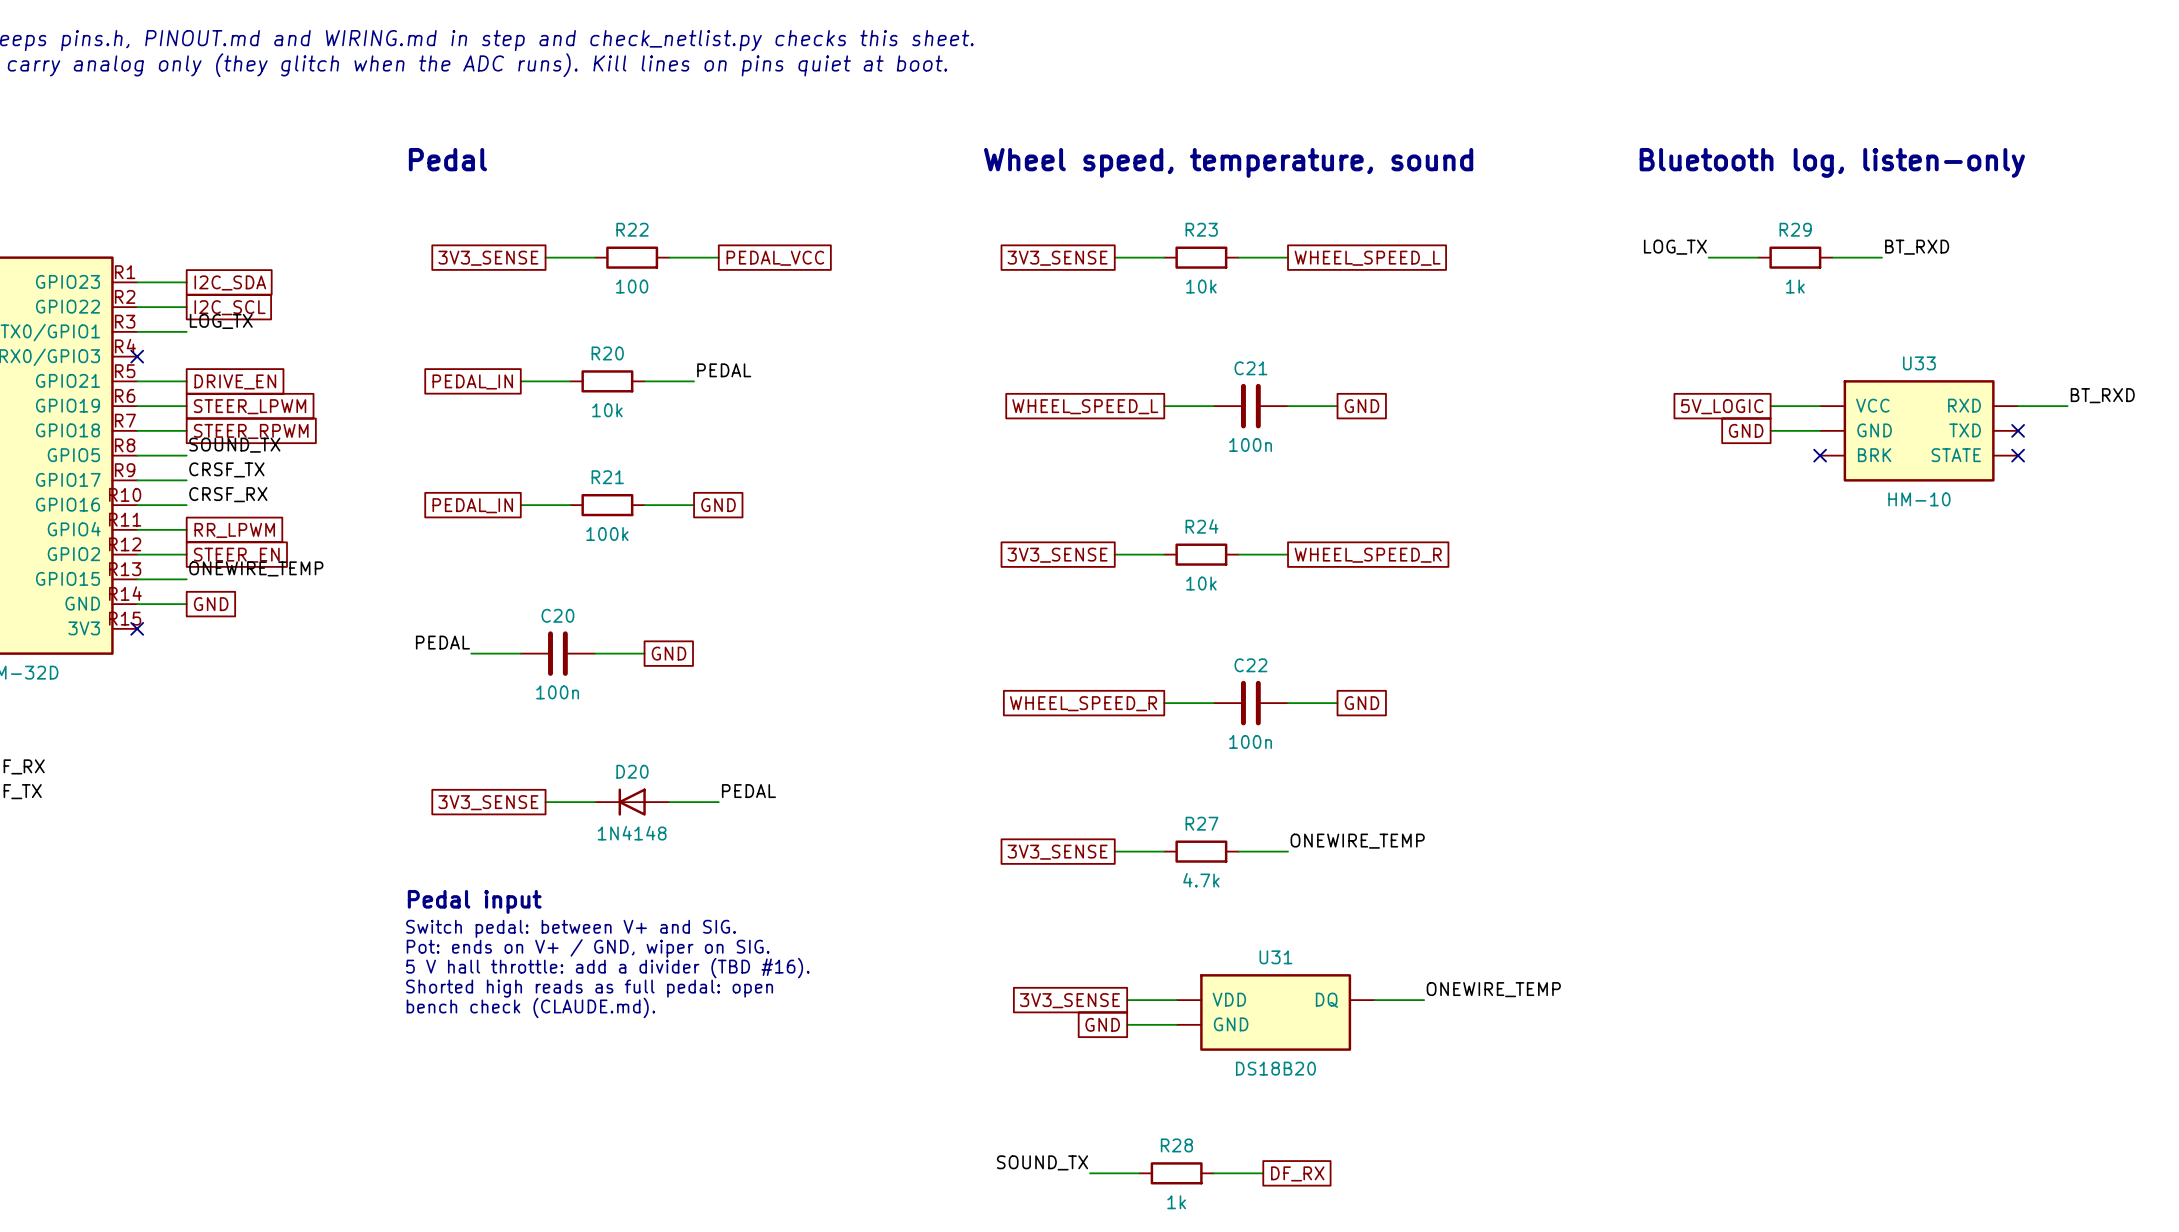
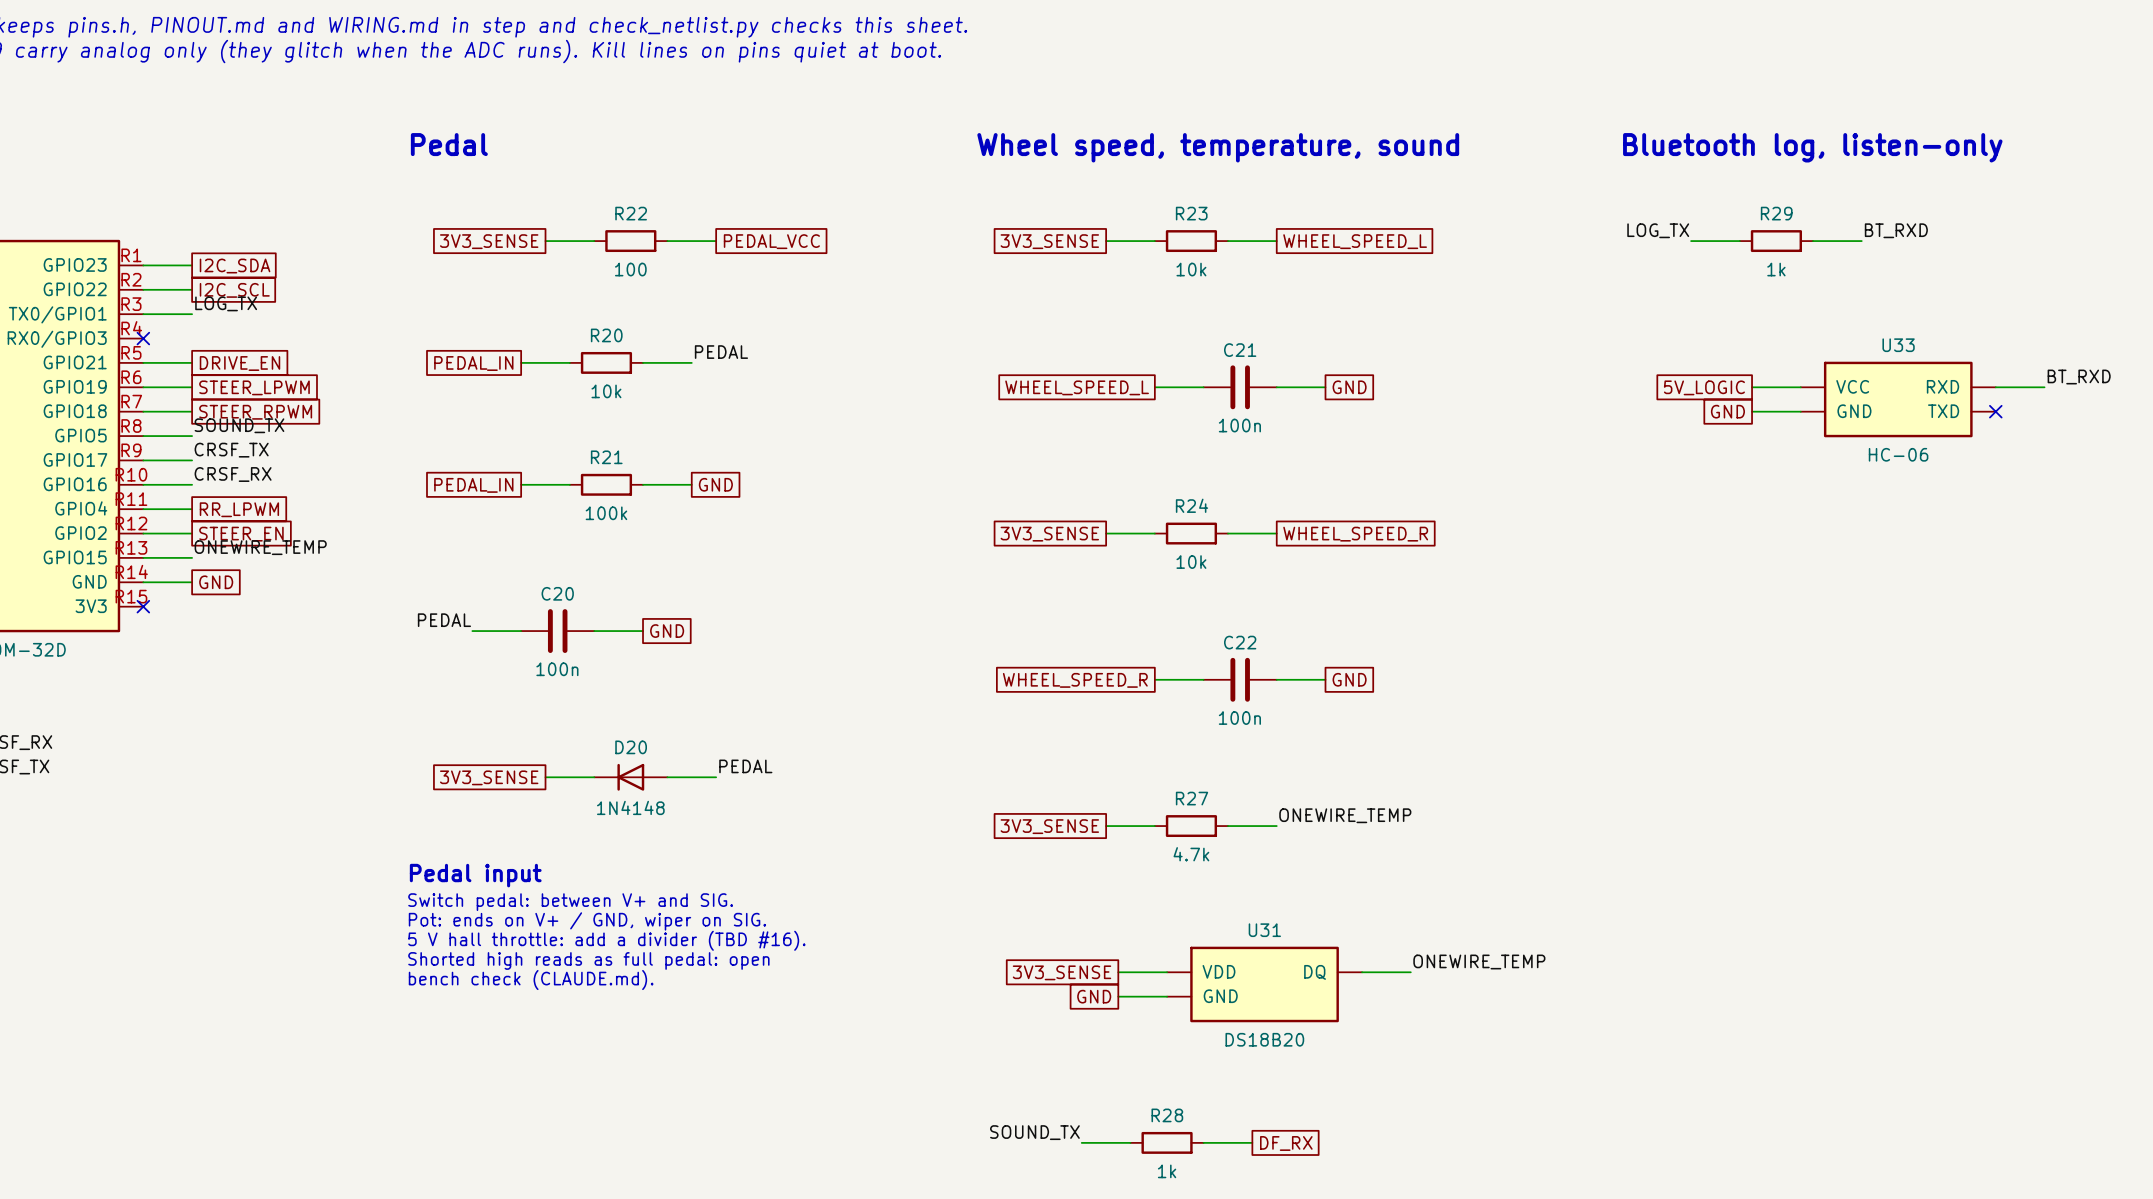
U33 symbol: [1820, 380, 2019, 482] -> [1800, 361, 1996, 438]
no-connect mark: (1820, 455) -> none
no-connect mark: (2018, 455) -> none
U33 value: HM-10 (1919, 499) -> HC-06 (1898, 454)

